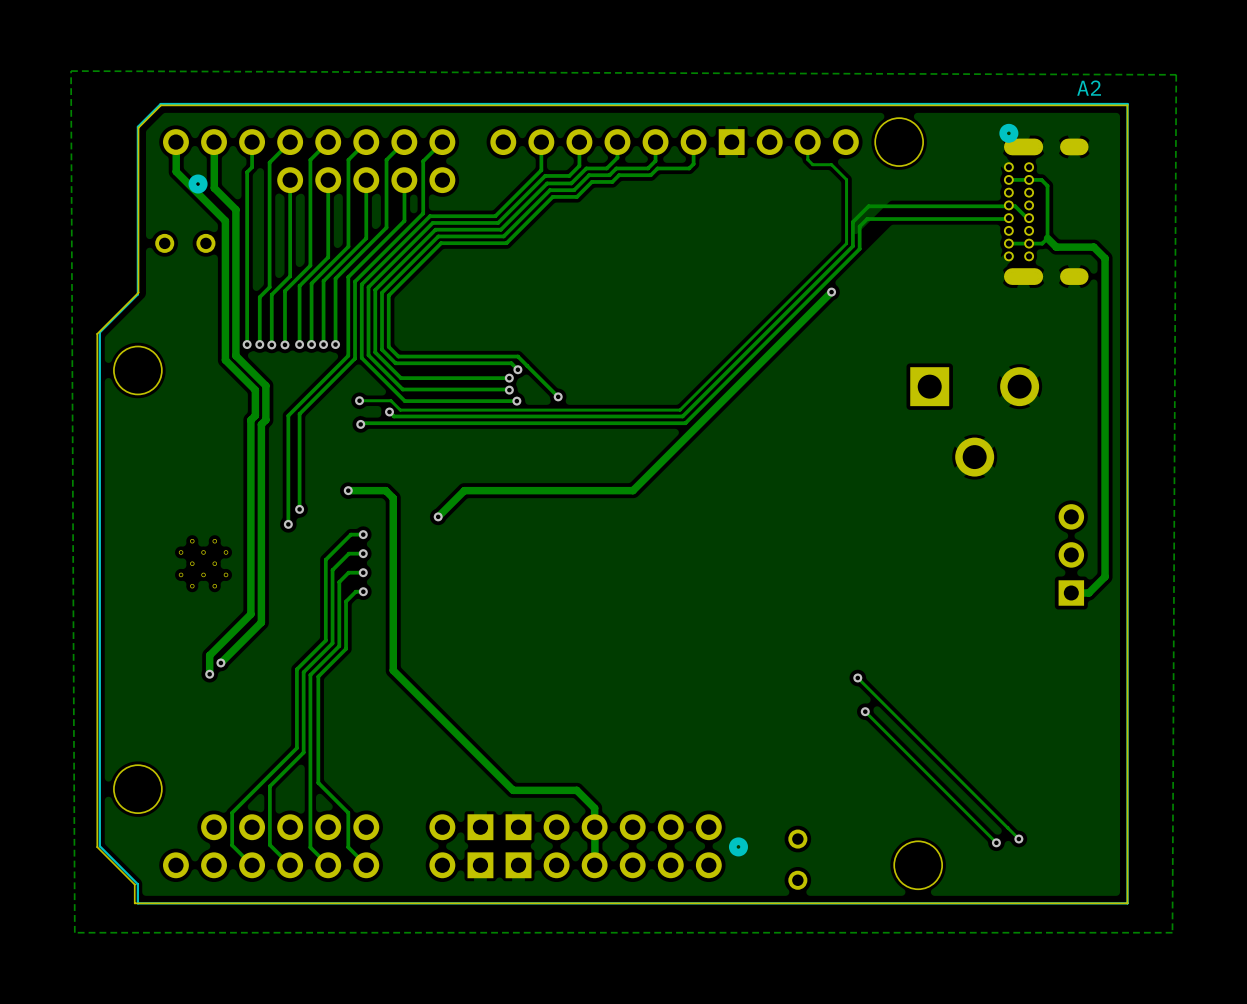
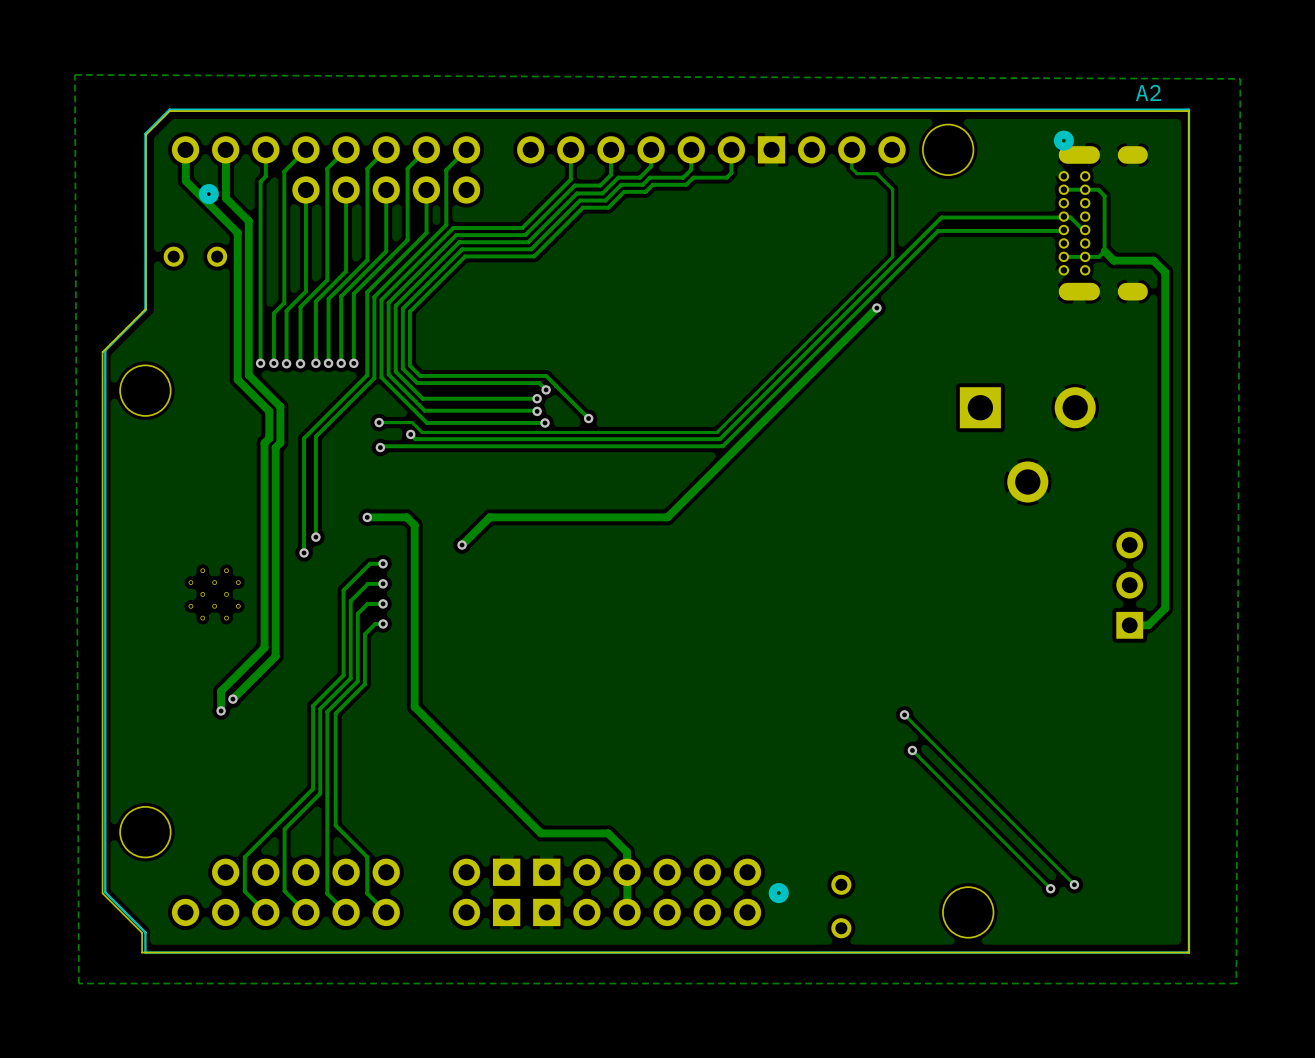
track: (892, 206) (868, 206) (852, 222) (852, 246) -> (941, 217) (899, 259)
track: (889, 219) (867, 219) (859, 226) (859, 249) -> (938, 230) (906, 262)

